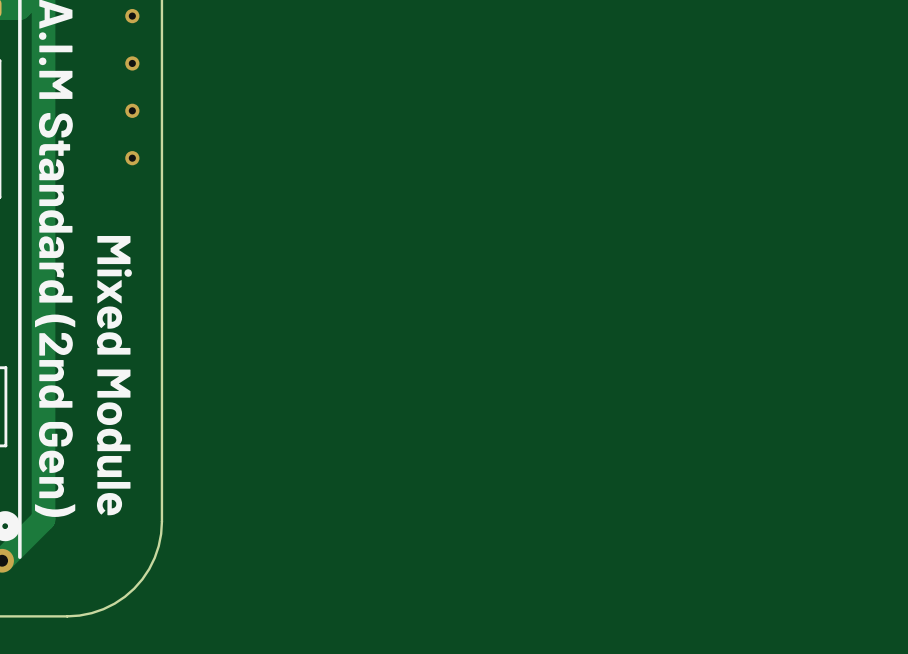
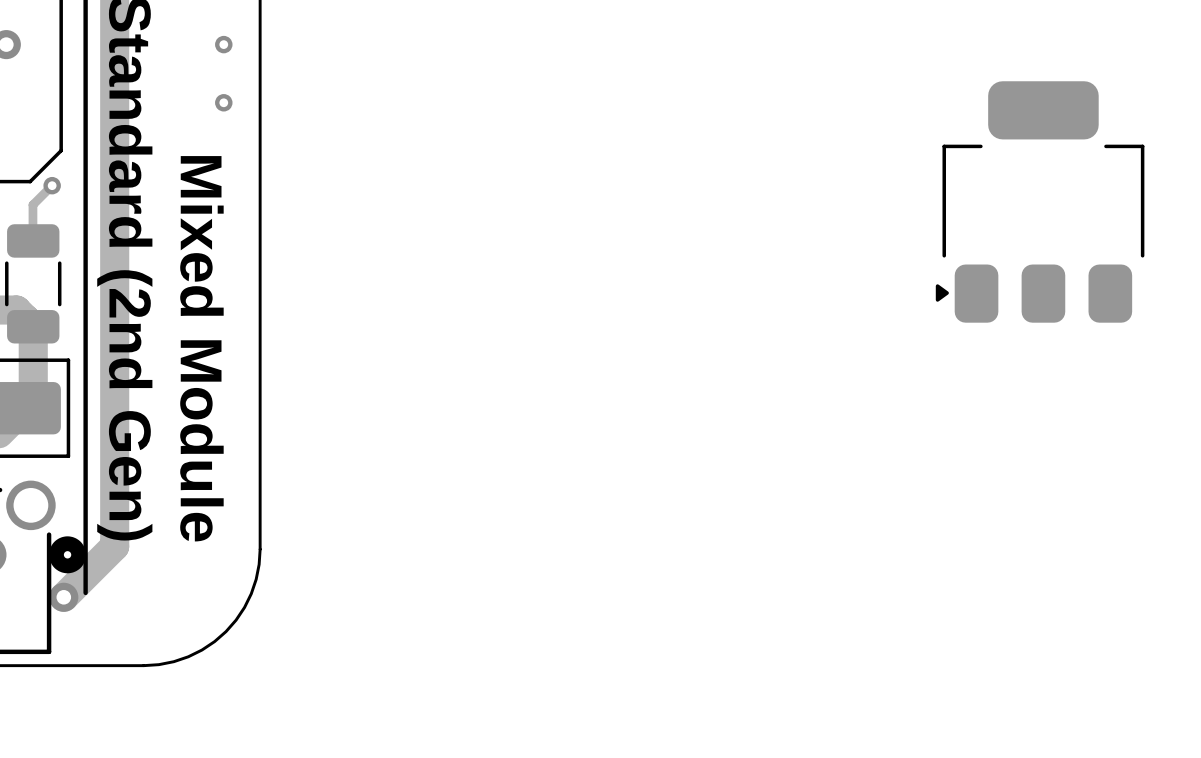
part: none -> (1040, 201)

